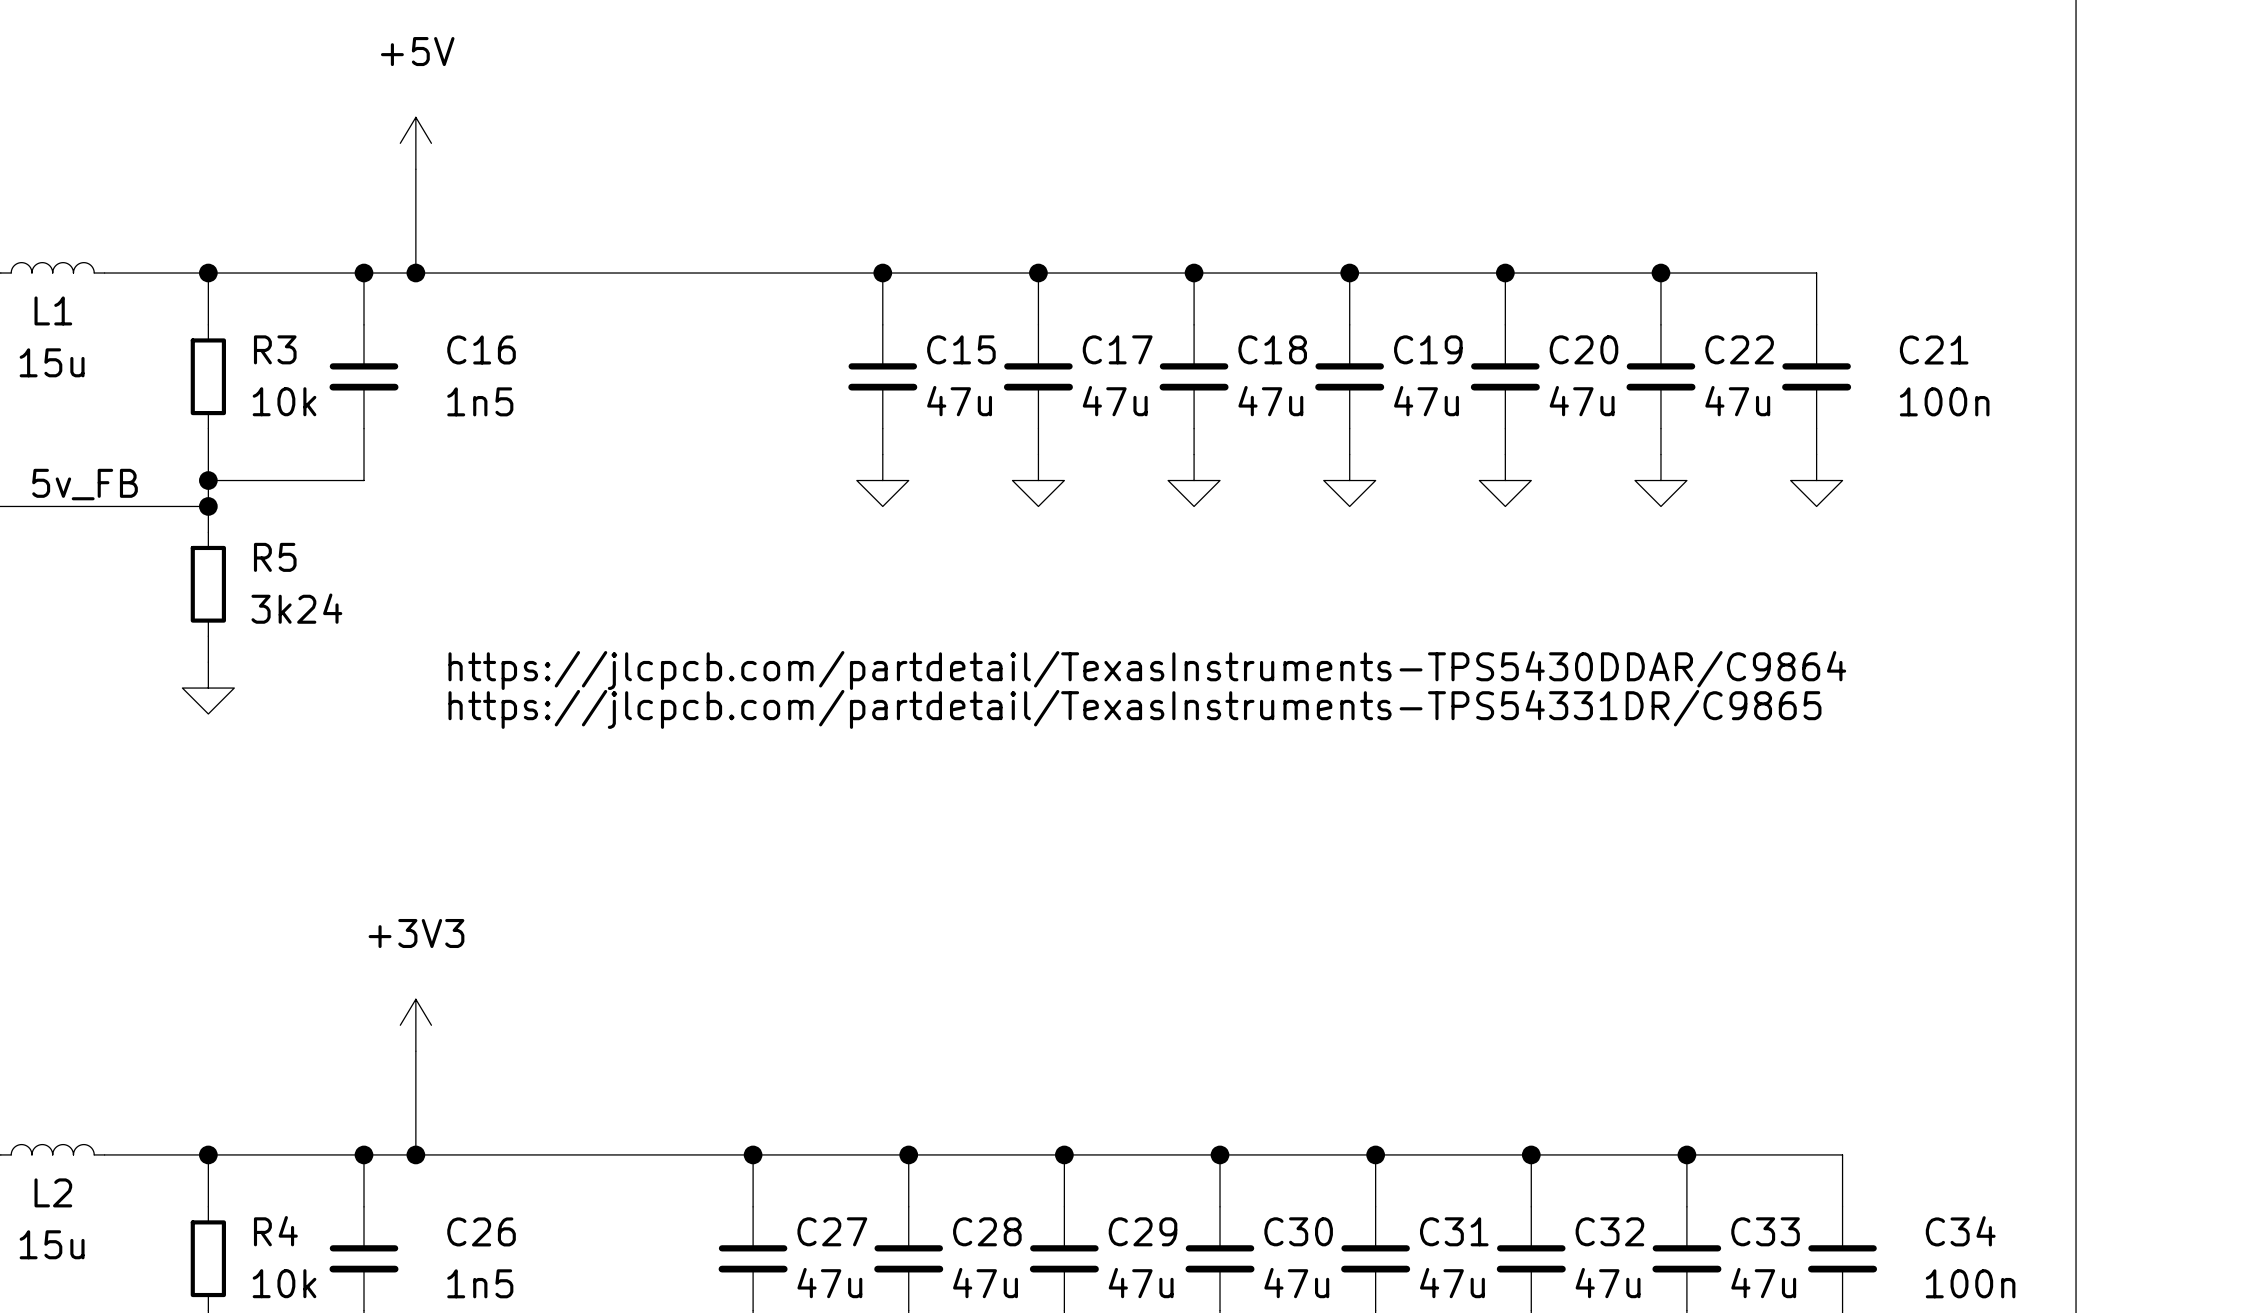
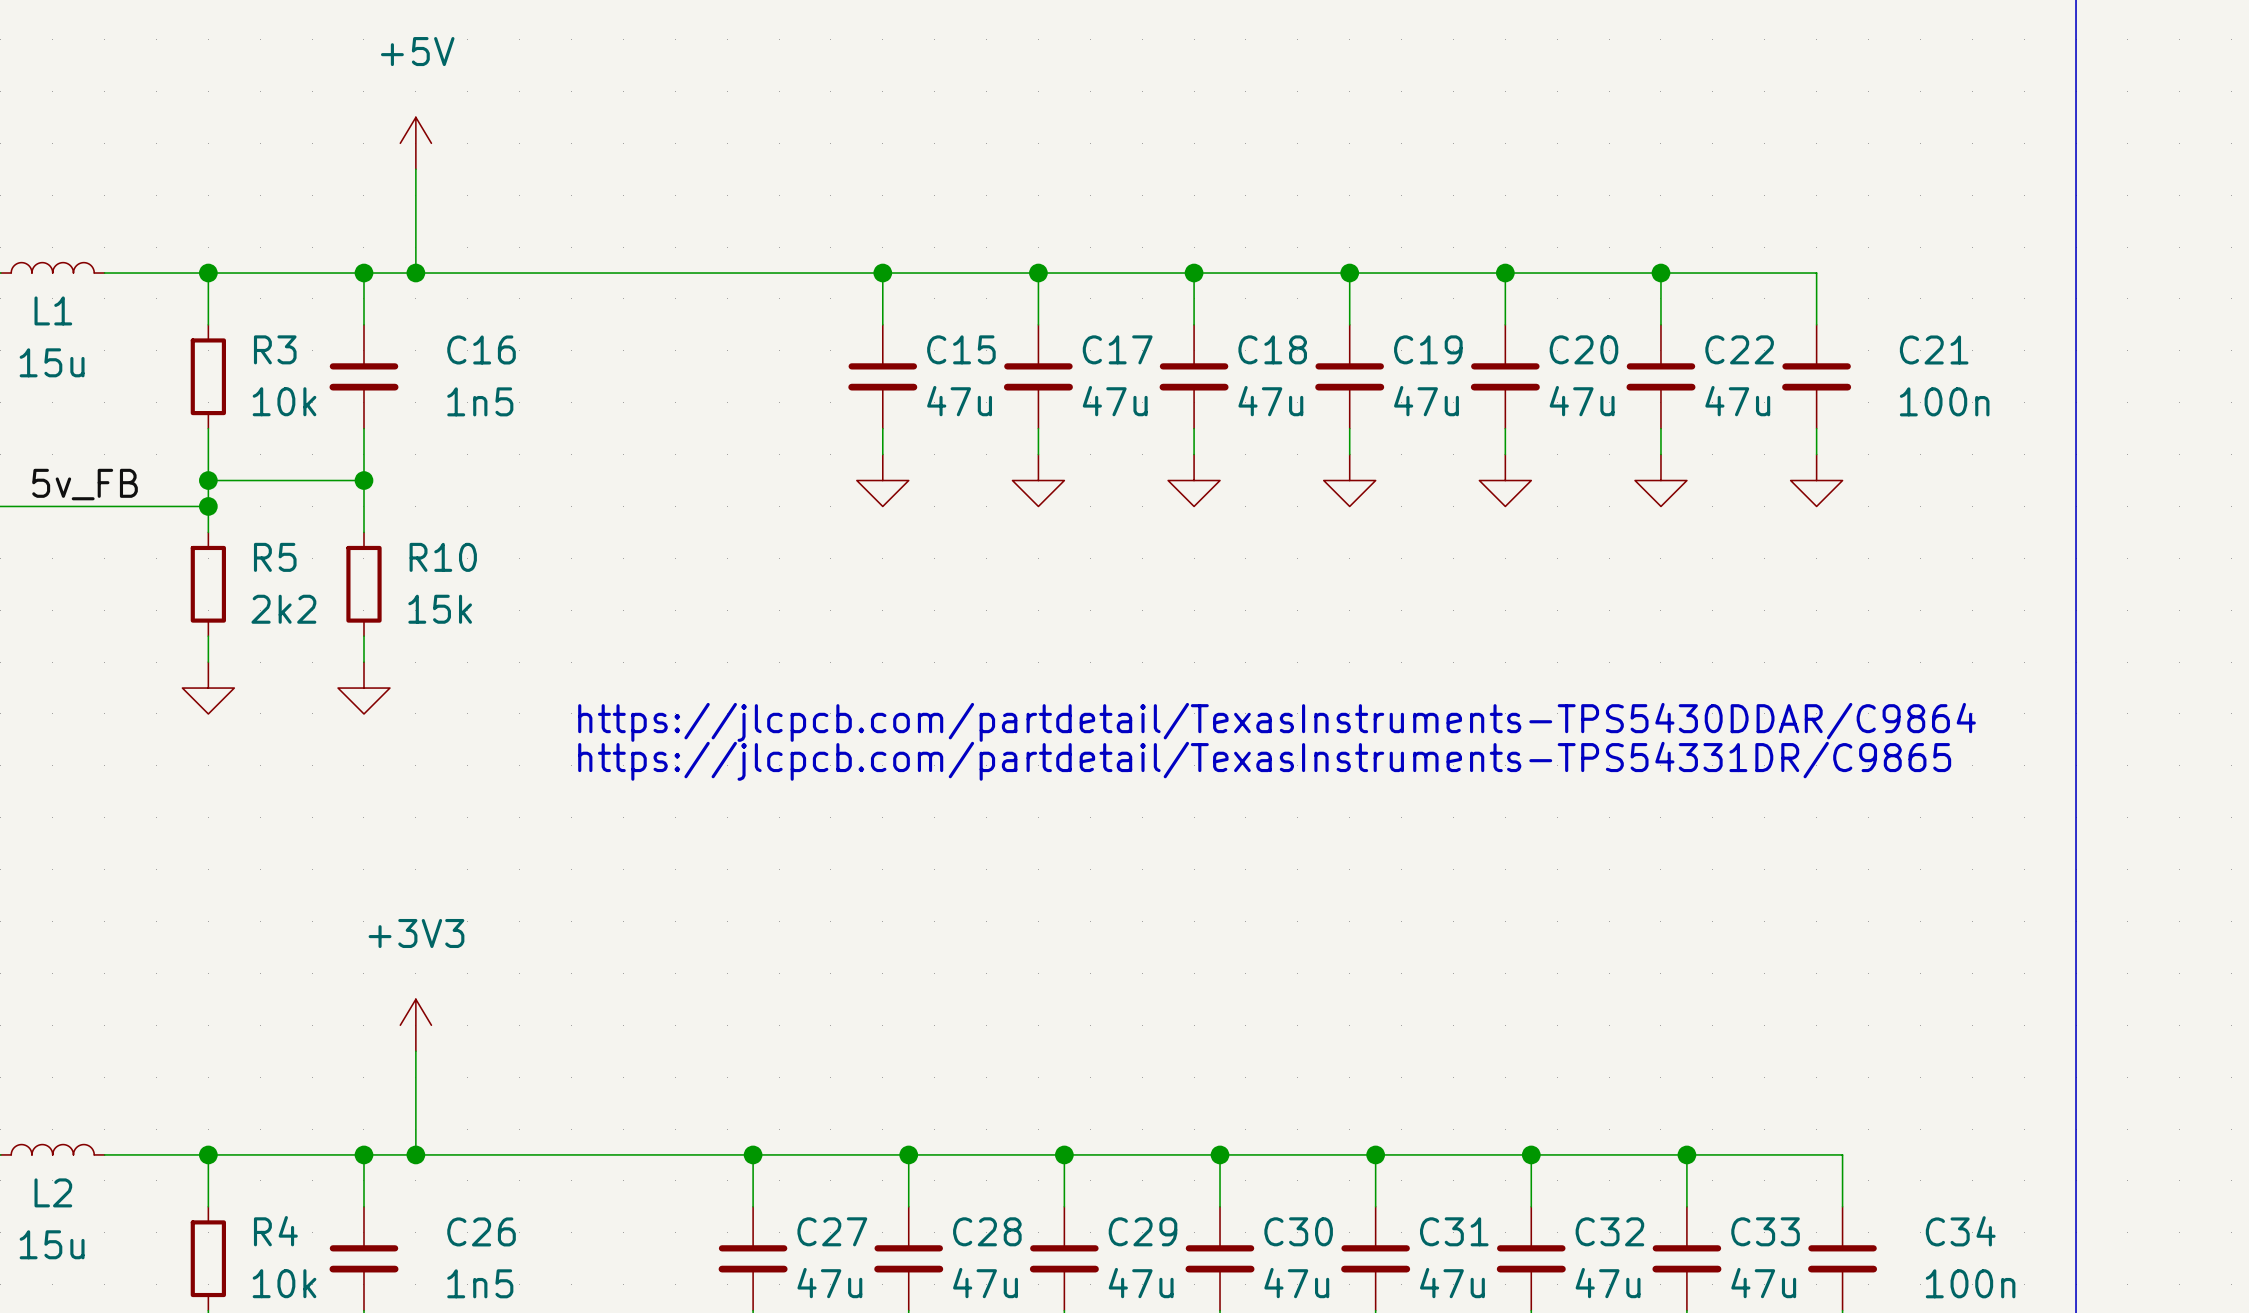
wire: none -> (363, 480) (363, 532)
junction: none -> (363, 480)
R10: none -> 15k (363, 584)
R5 value: 3k24 (296, 608) -> 2k2 (283, 609)
wire: none -> (363, 636) (363, 662)
text position: https://jlcpcb.com/partdetail/TexasInstruments-TPS5430DDAR/C9864 (1147, 670) -> https://jlcpcb.com/partdetail/TexasInstruments-TPS5430DDAR/C9864 (1277, 722)
power symbol: none -> (363, 688)
text position: https://jlcpcb.com/partdetail/TexasInstruments-TPS54331DR/C9865 (1134, 709) -> https://jlcpcb.com/partdetail/TexasInstruments-TPS54331DR/C9865 (1264, 761)

